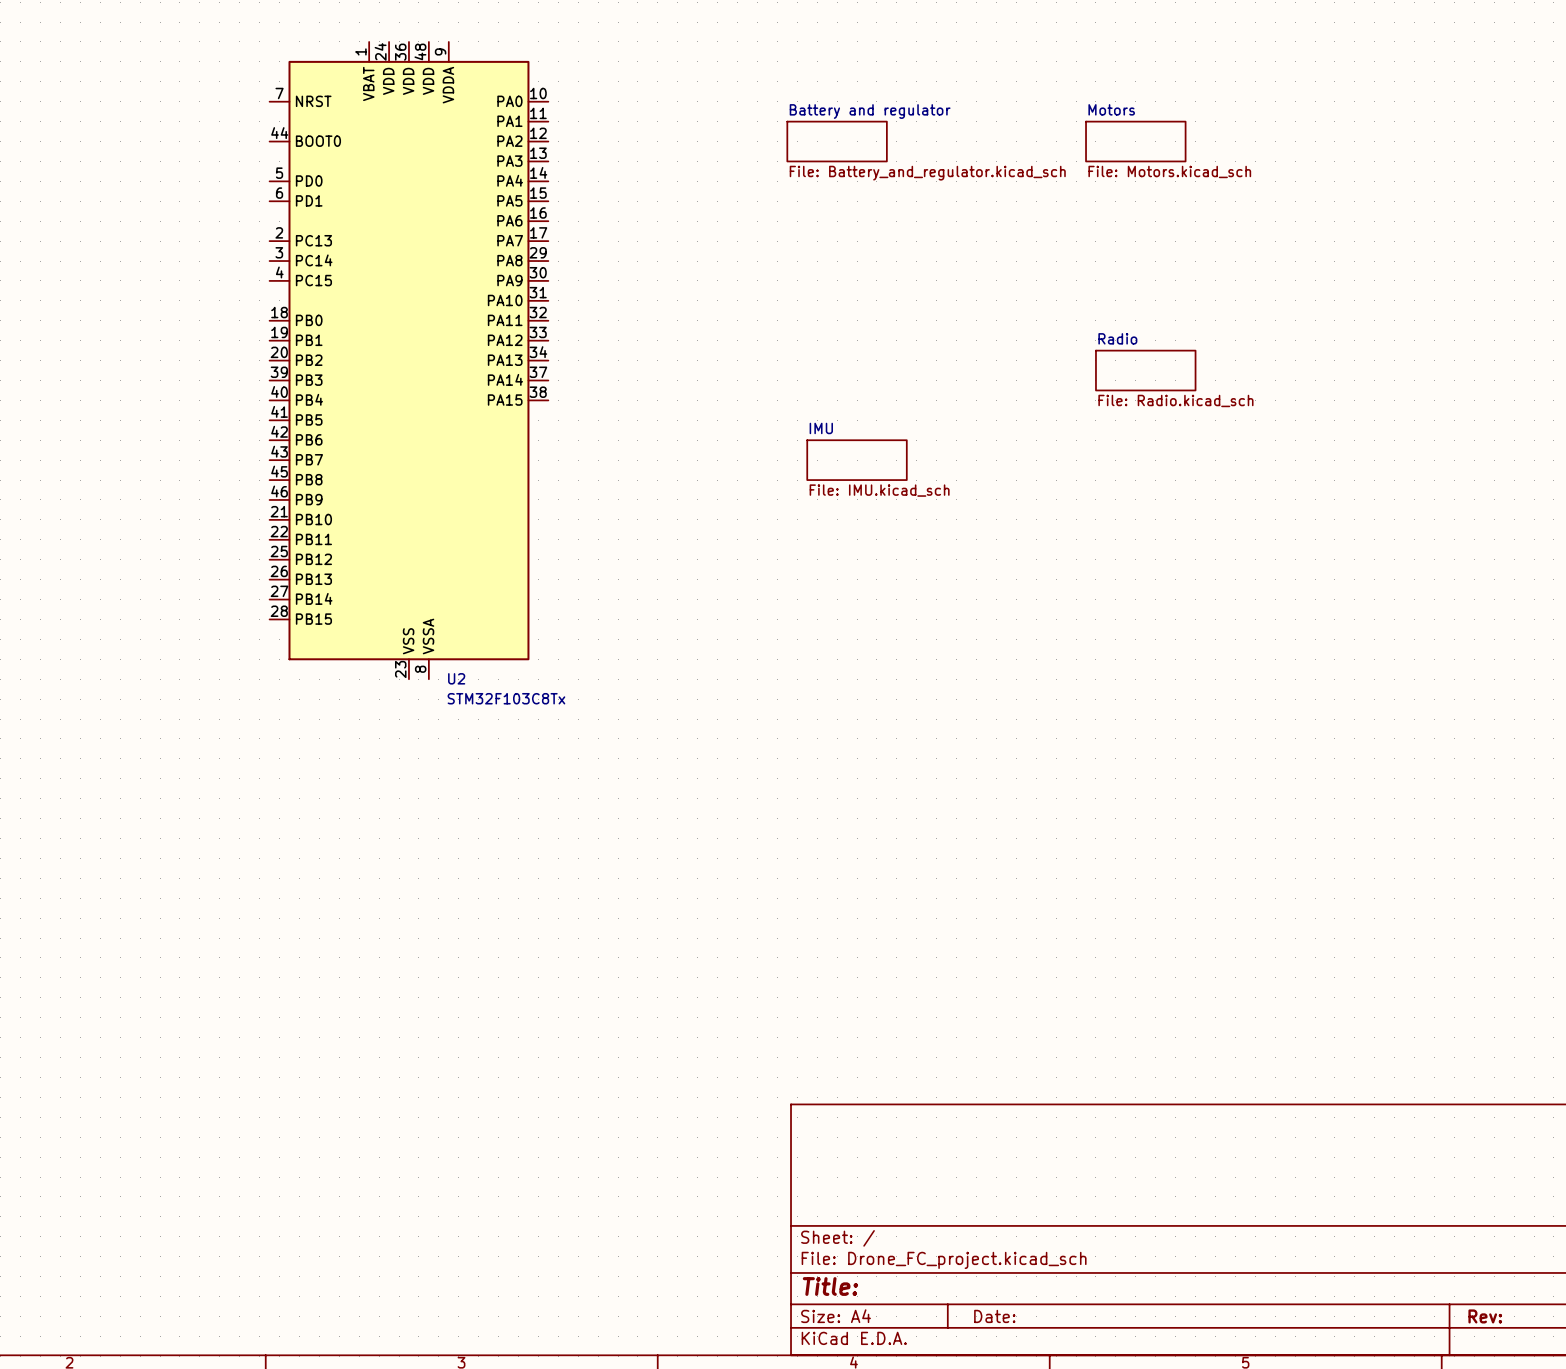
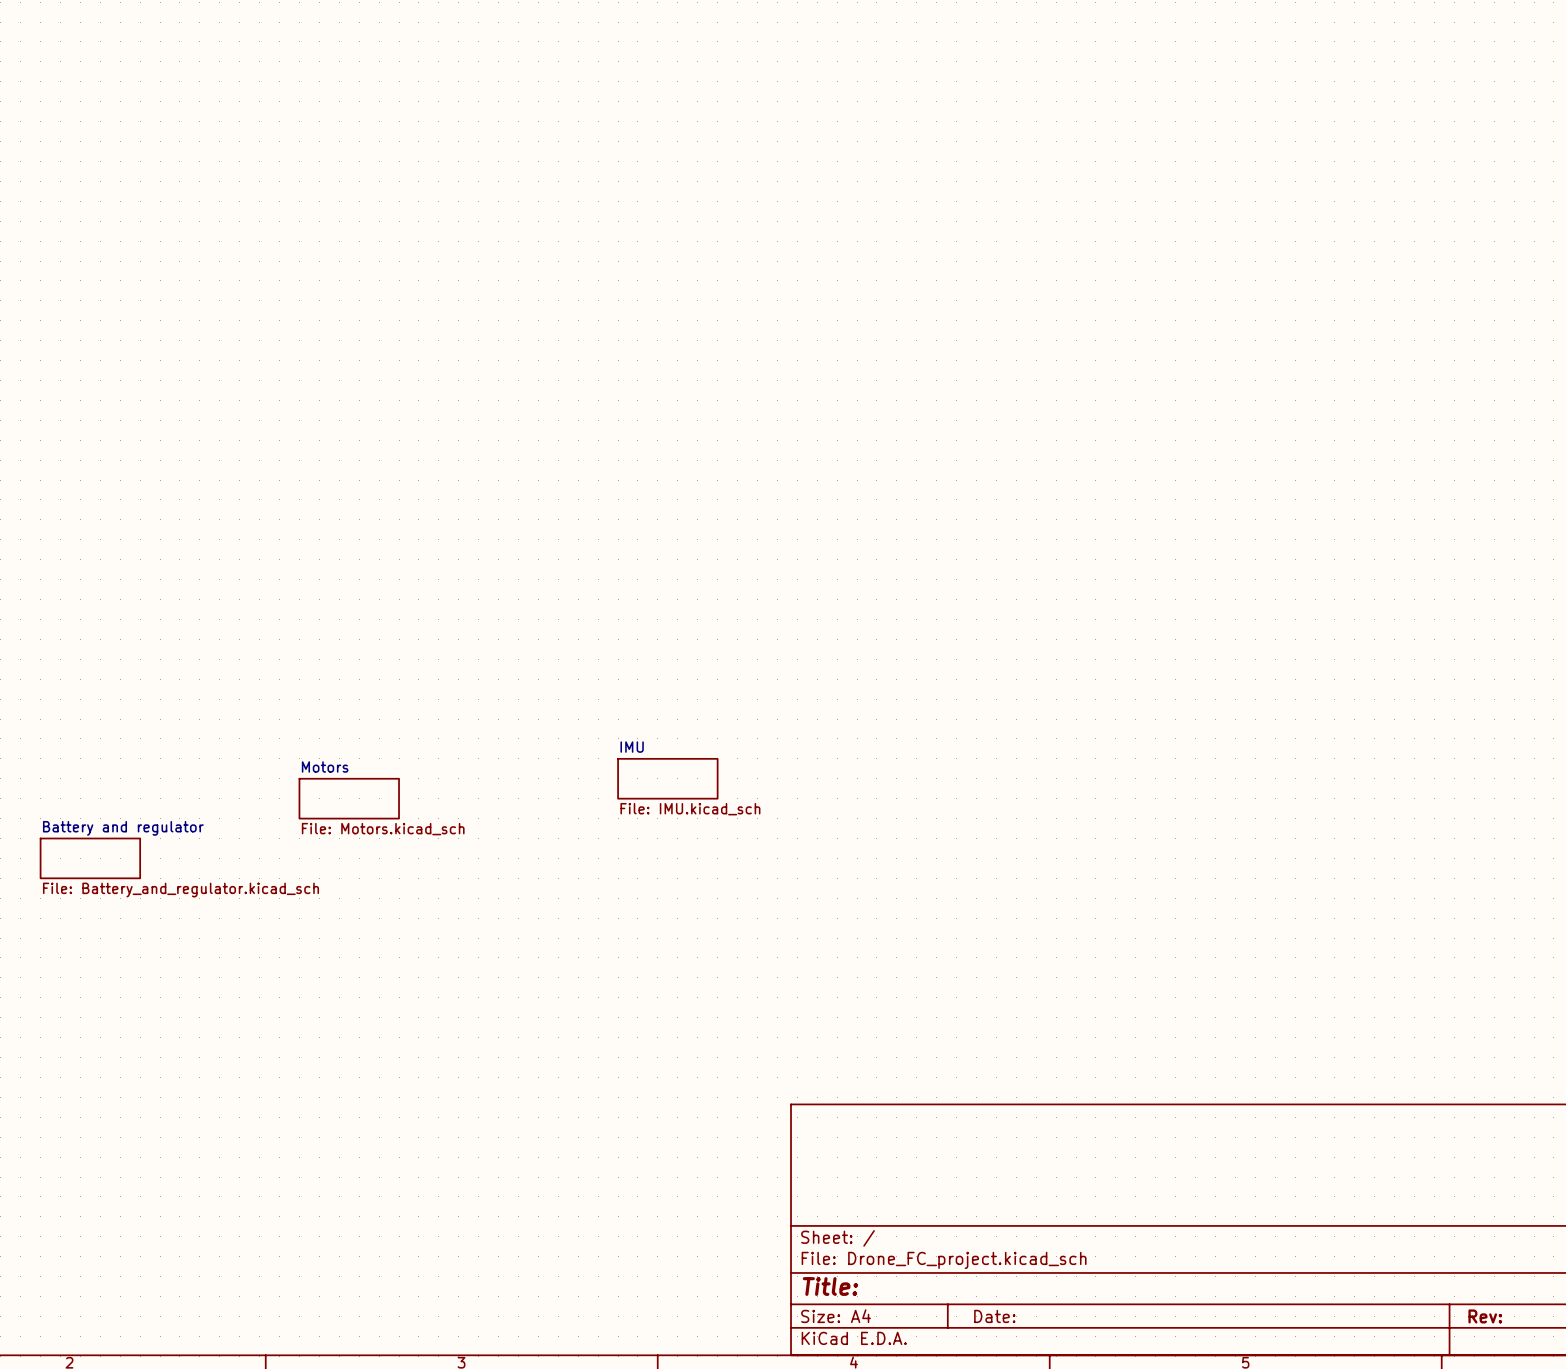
sheet Battery and regulator: File: Battery_and_regulator.kicad_sch (837, 141) -> none
sheet Motors: File: Motors.kicad_sch (1135, 141) -> none
U2: STM32F103C8Tx (408, 360) -> none
sheet Radio: File: Radio.kicad_sch (1145, 370) -> none
sheet IMU: File: IMU.kicad_sch (857, 460) -> none
sheet IMU: none -> File: IMU.kicad_sch (667, 778)
sheet Motors: none -> File: Motors.kicad_sch (349, 798)
sheet Battery and regulator: none -> File: Battery_and_regulator.kicad_sch (90, 858)

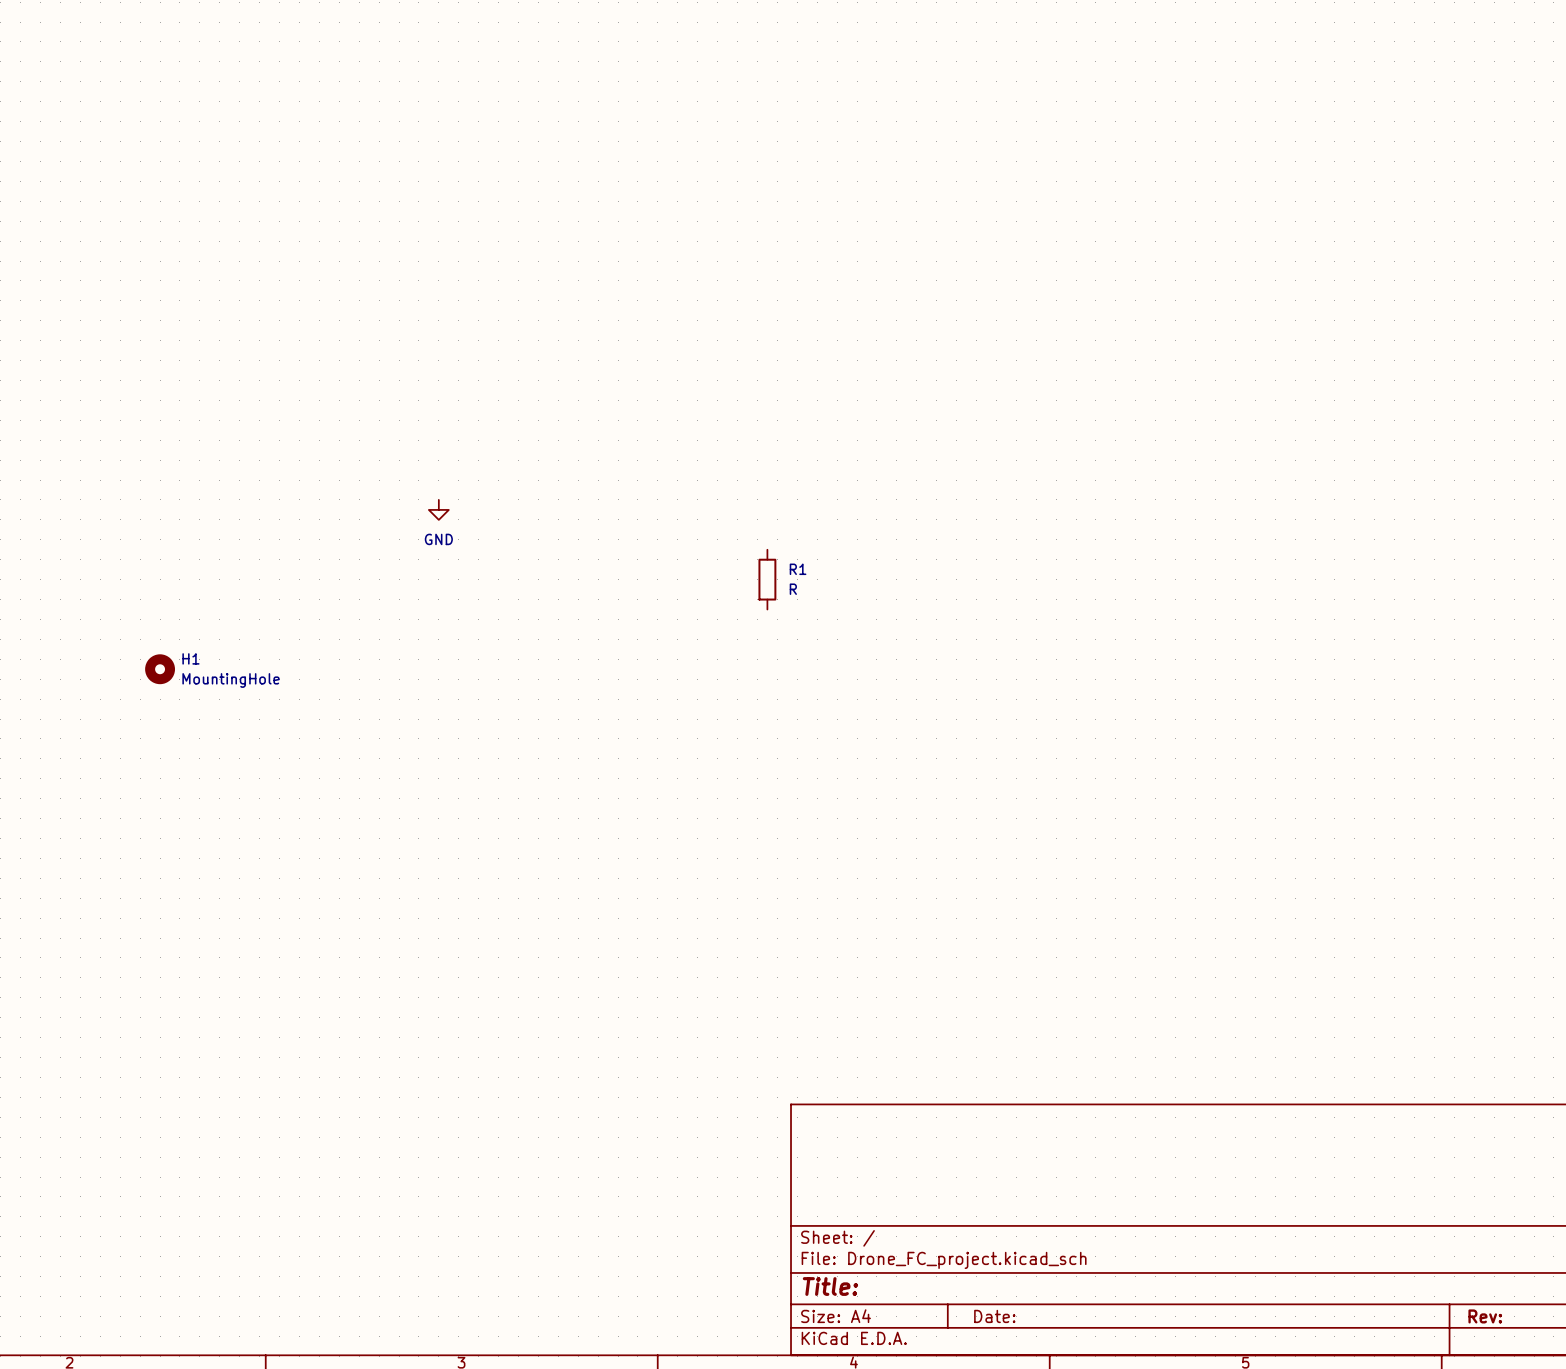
power symbol: none -> GND (438, 509)
R1: none -> R (767, 579)
H1: none -> MountingHole (160, 669)
sheet IMU: File: IMU.kicad_sch (667, 778) -> none
sheet Motors: File: Motors.kicad_sch (349, 798) -> none
sheet Battery and regulator: File: Battery_and_regulator.kicad_sch (90, 858) -> none

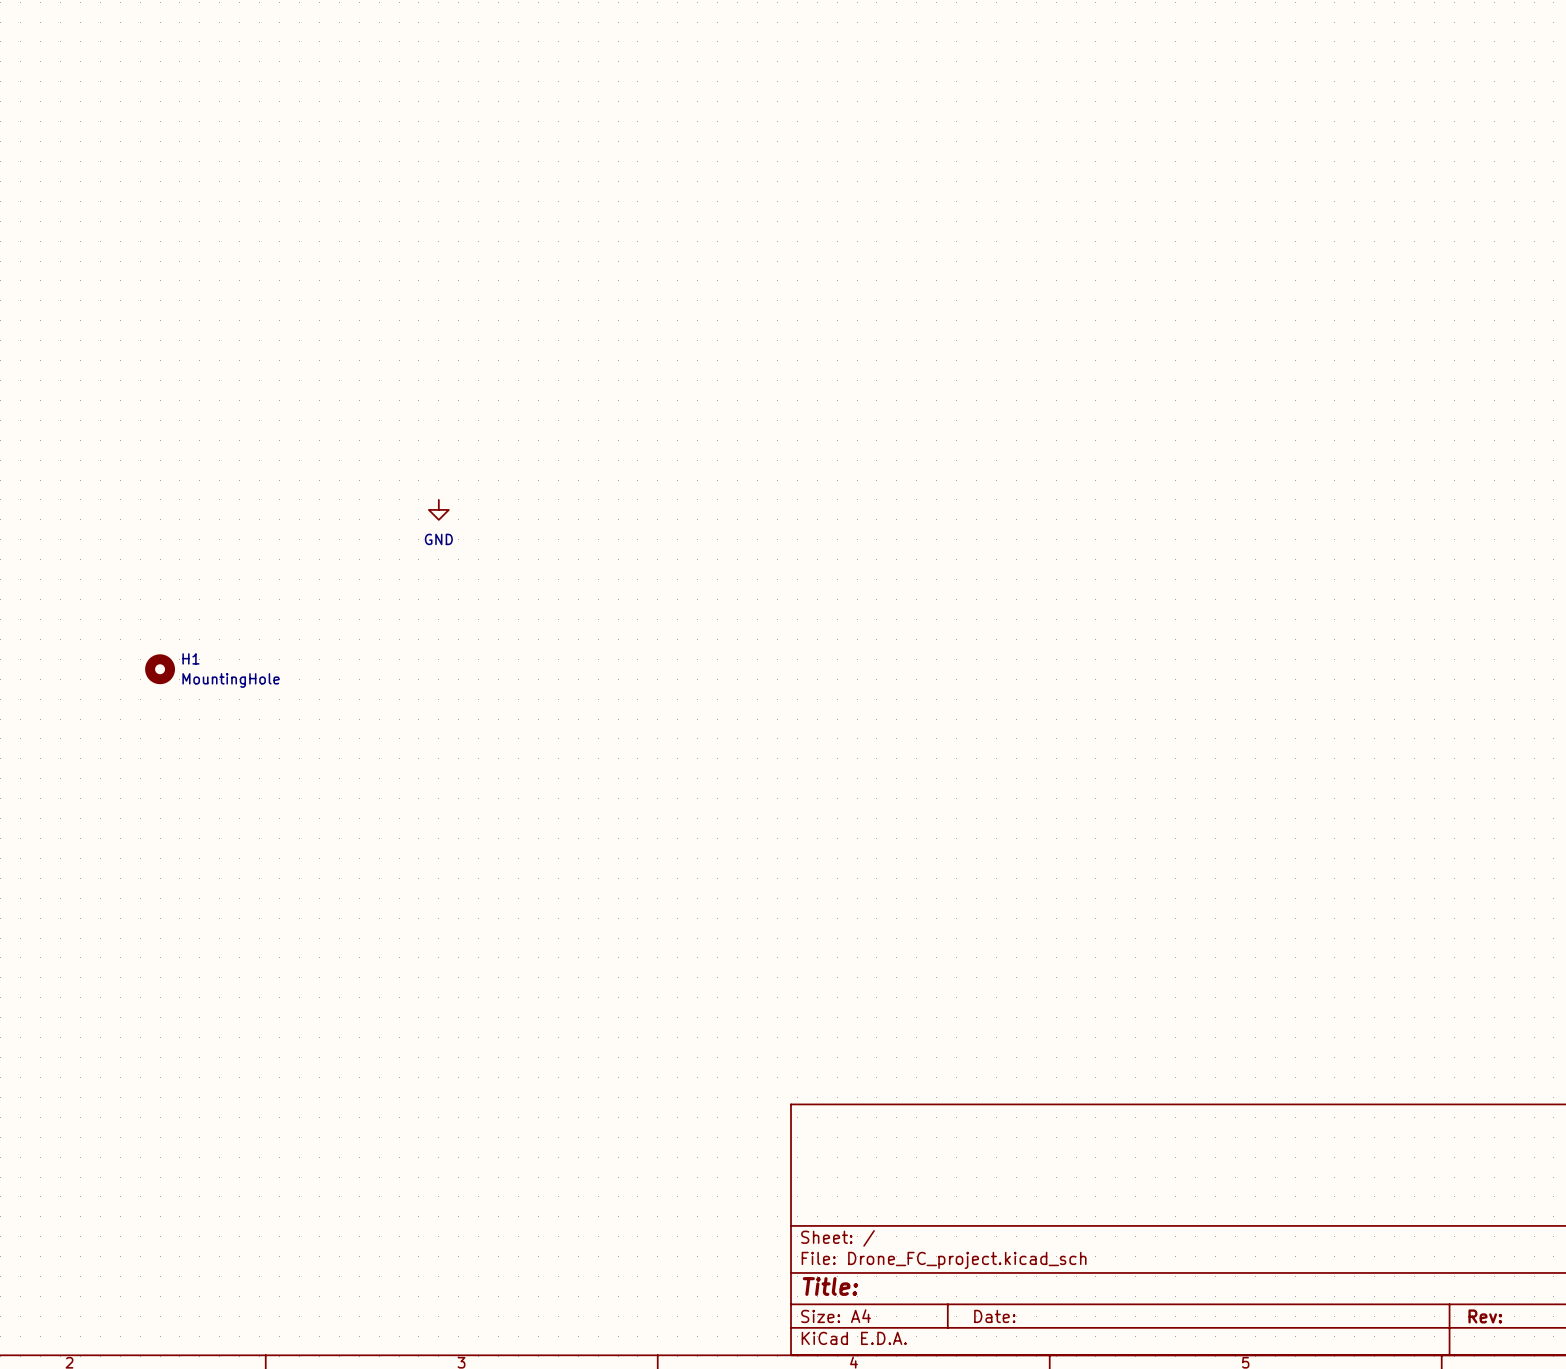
R1: R (767, 579) -> none

